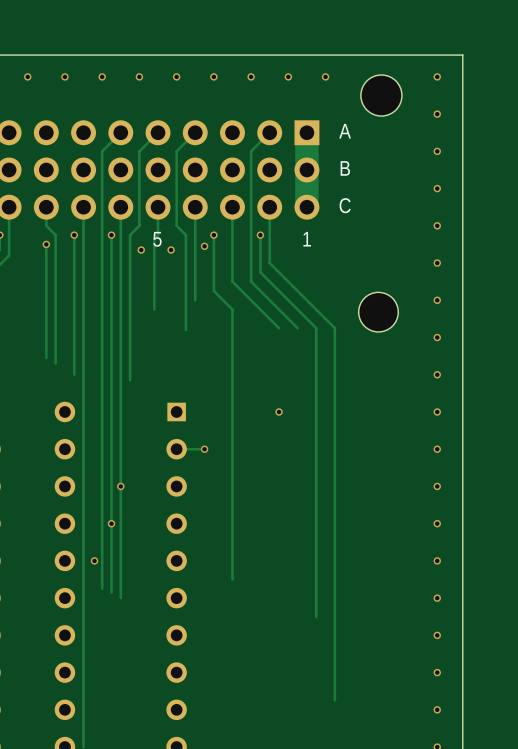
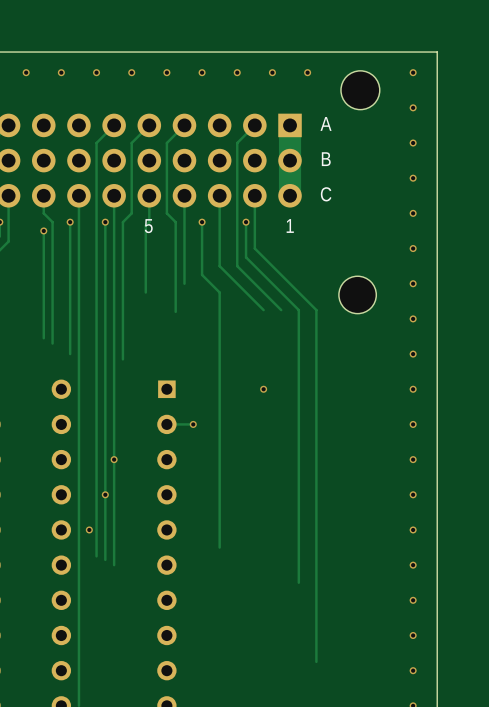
via: (204, 246) -> none
via: (141, 250) -> none
via: (171, 250) -> none

